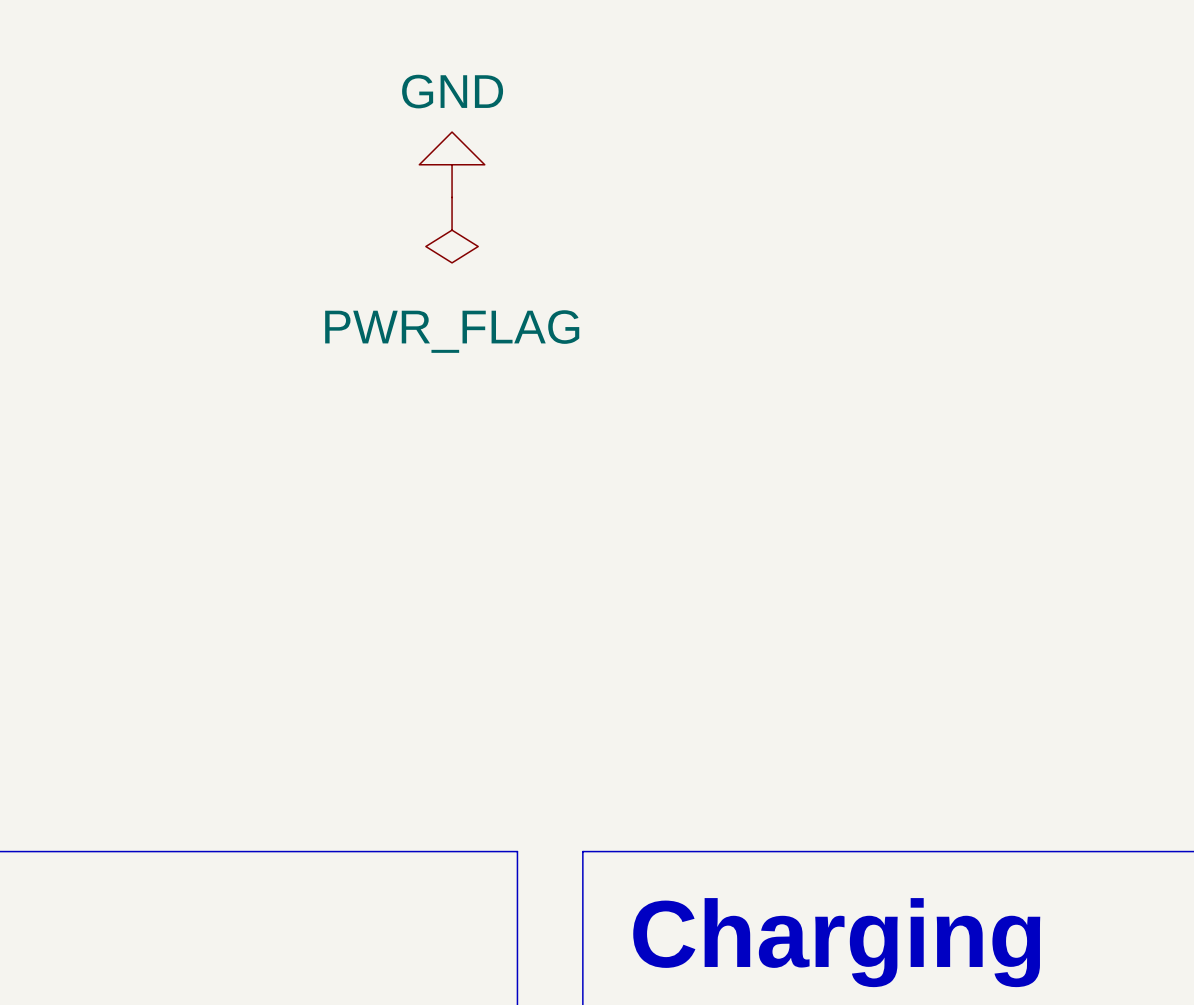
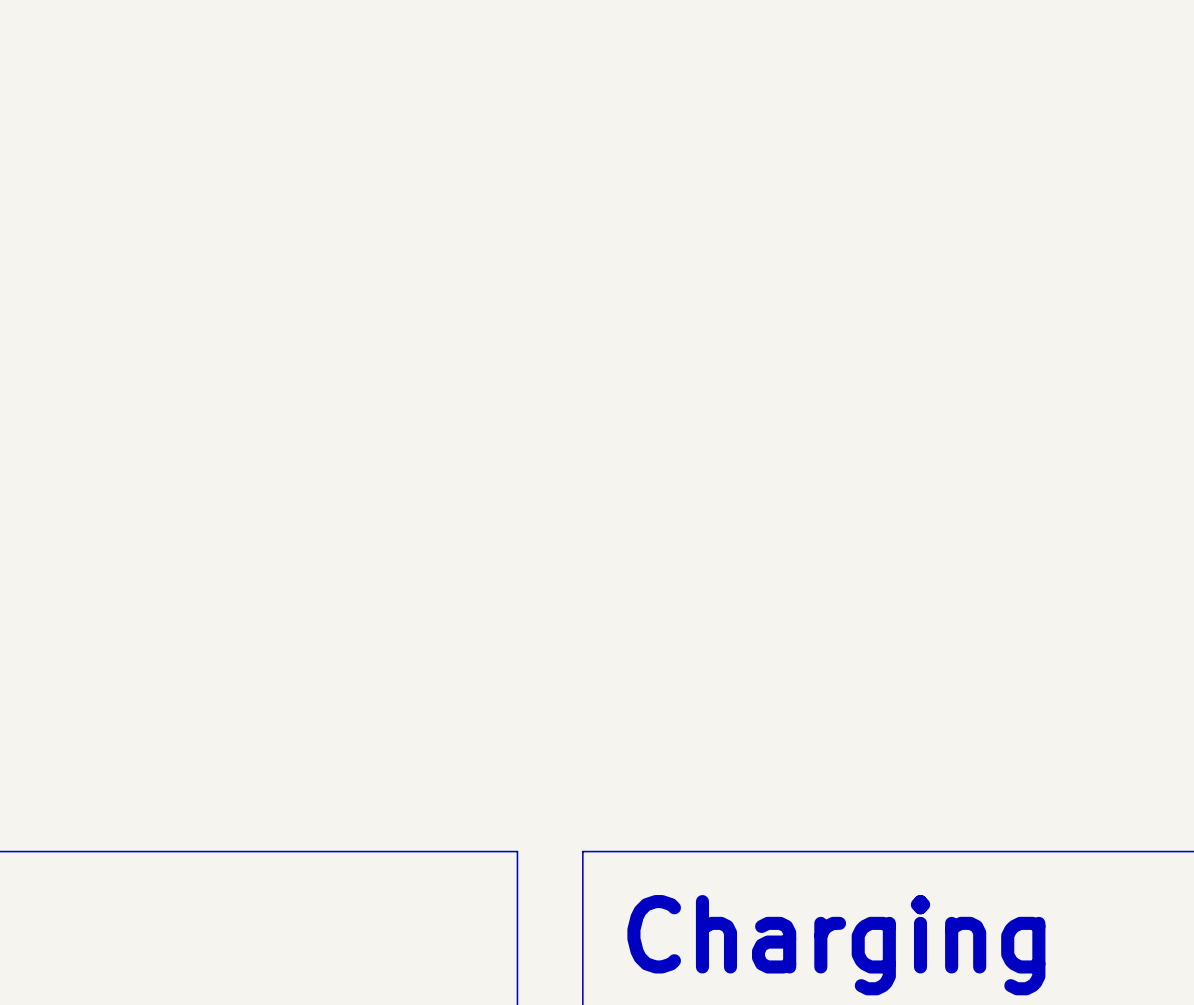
power symbol: GND (452, 164) -> none
power symbol: PWR_FLAG (452, 230) -> none

